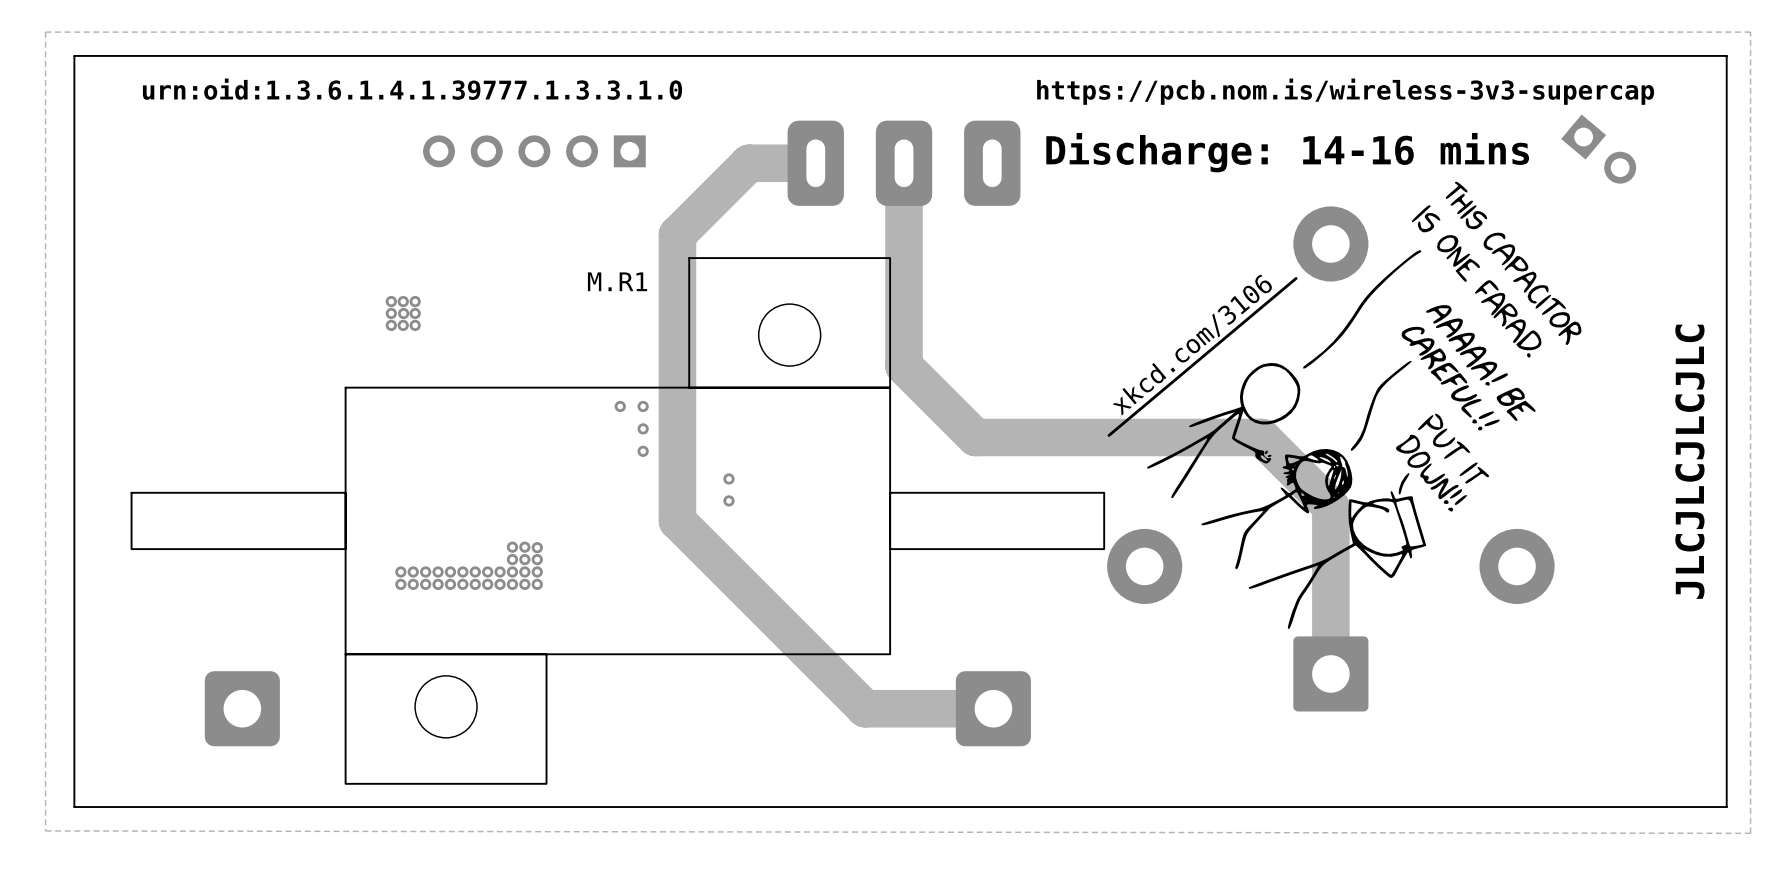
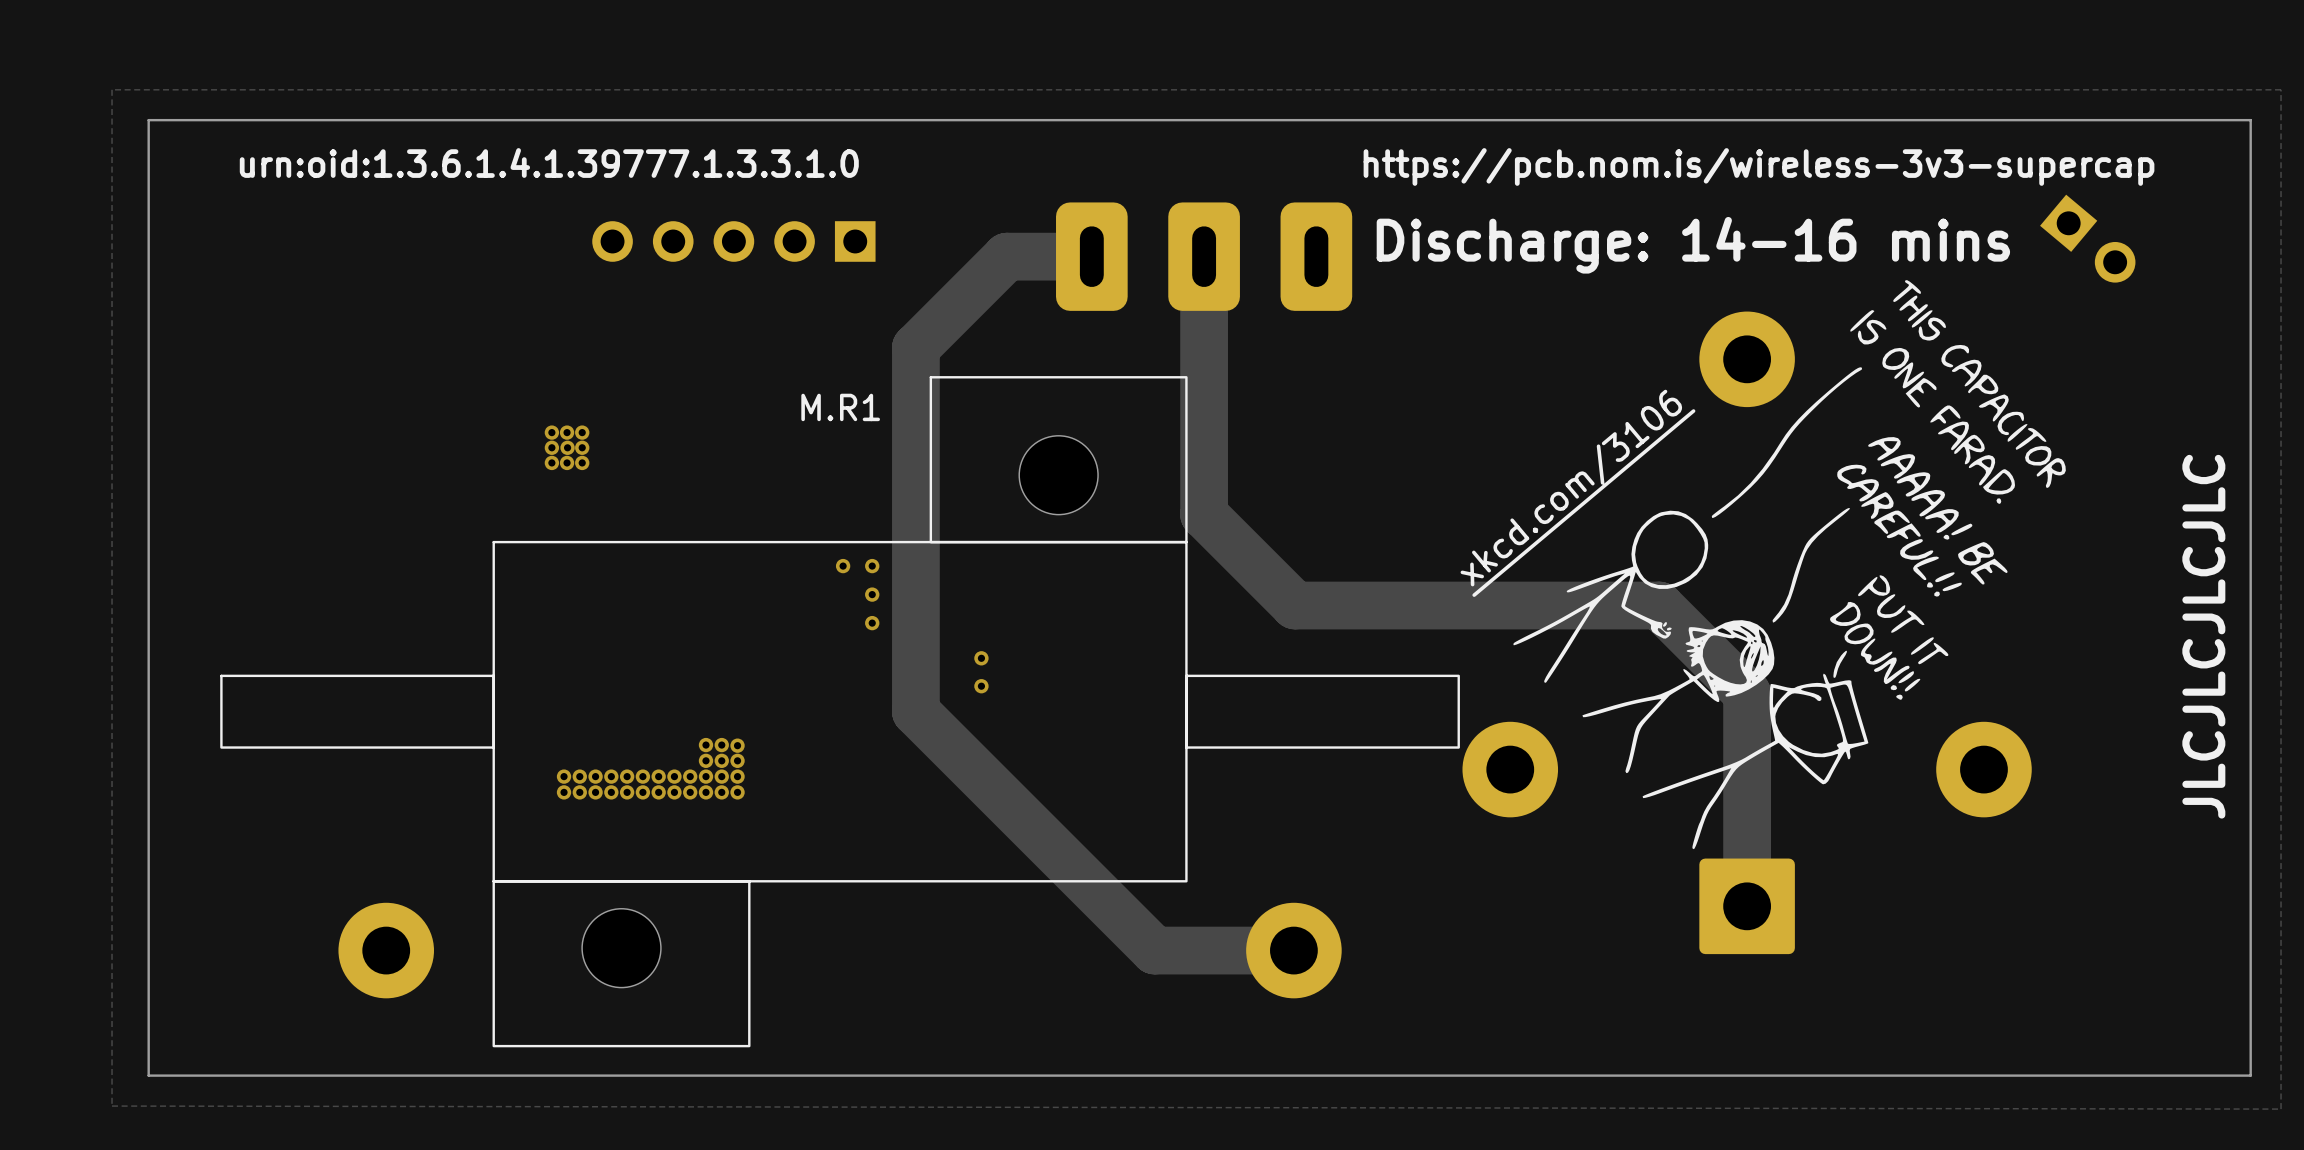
M.R1 footprint: [130, 257, 1106, 785] -> [220, 376, 1460, 1048]

